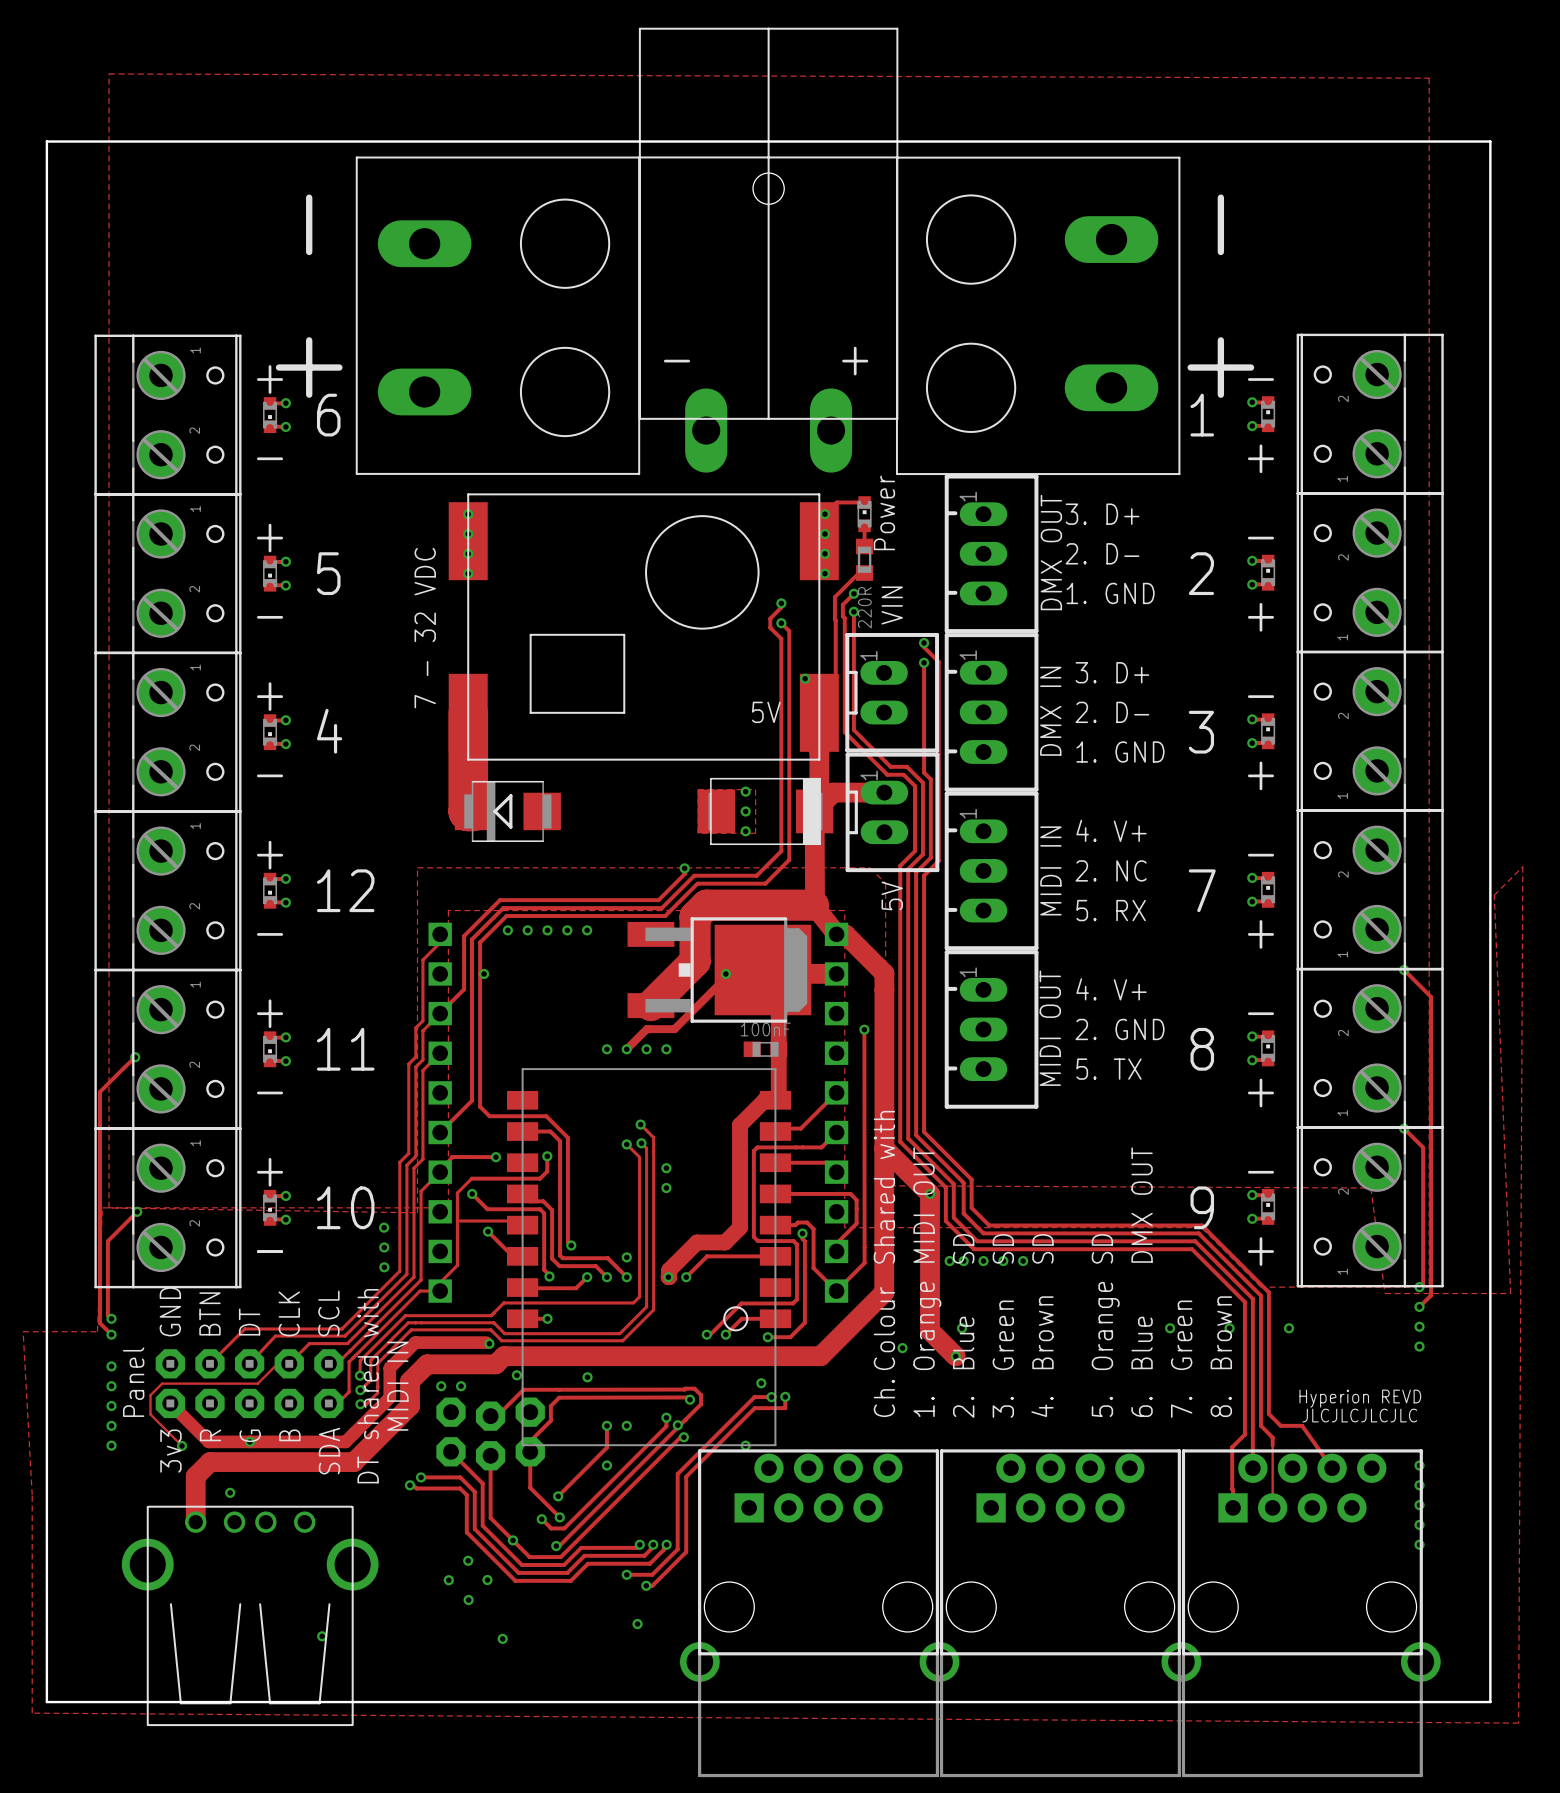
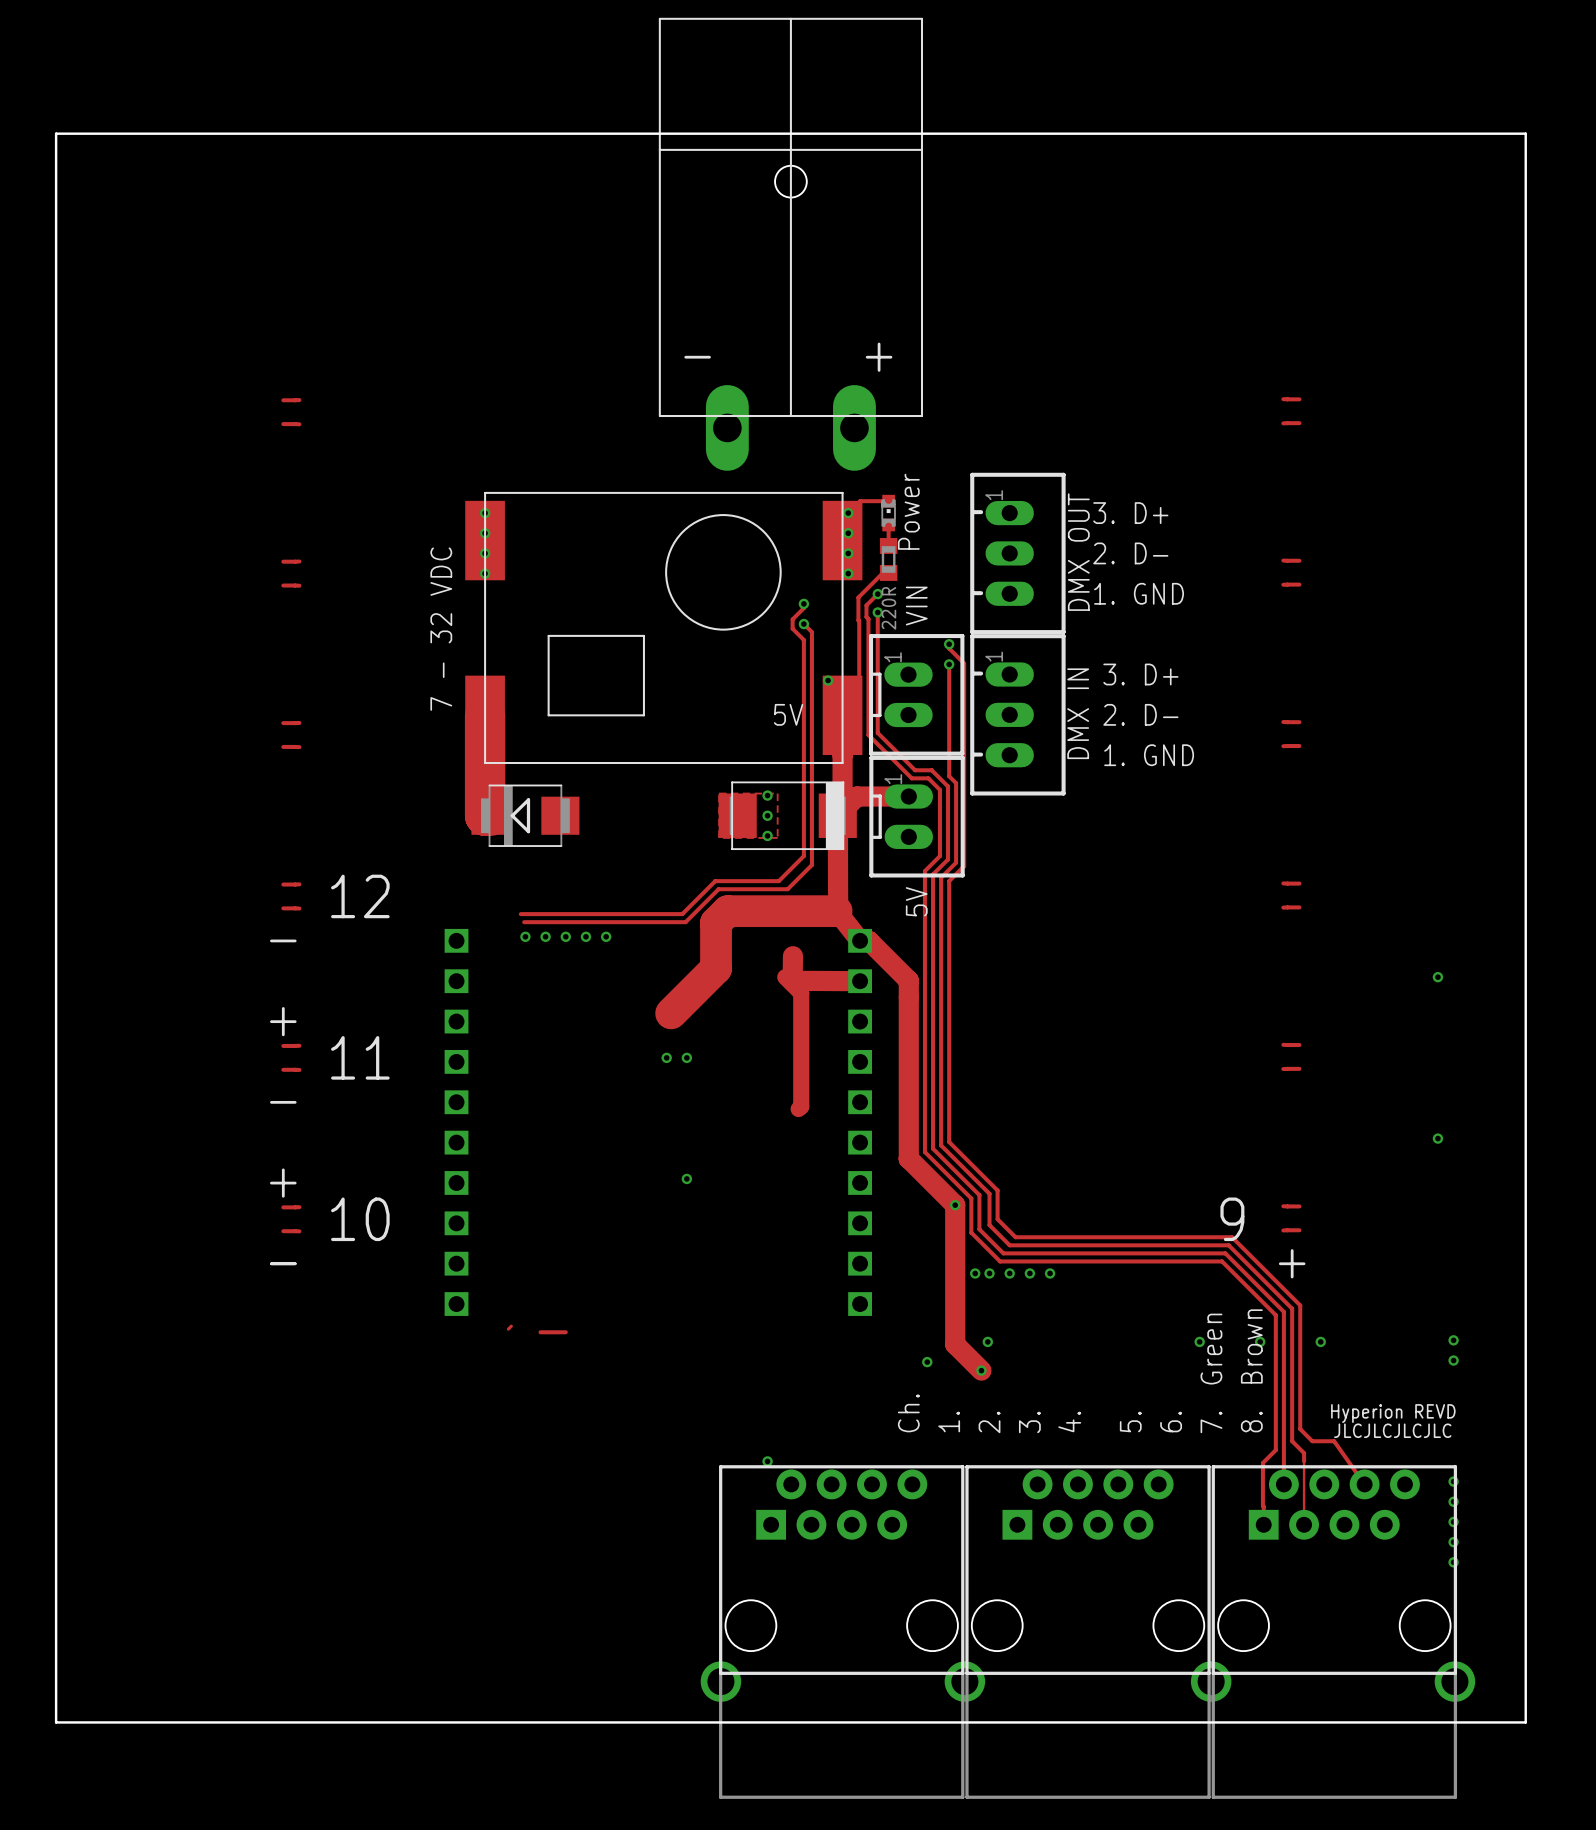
zone outline: (108, 73) (108, 1207) (448, 1207) (448, 910) (844, 910) (844, 1227) (1201, 1227) (1260, 1287) (1429, 1287) (1429, 78) (108, 73) -> none
text: + - (309, 296) -> none
text: + - (1220, 296) -> none
part: (497, 315) -> none
part: (1038, 315) -> none
text: + (270, 379) -> none
text: - (1260, 379) -> none
via: (1252, 402) -> none
via: (285, 403) -> none
part: (1268, 414) -> none
part: (1370, 414) -> none
part: (167, 415) -> none
part: (270, 415) -> none
text: 6 (328, 415) -> none
text: 1 (1202, 415) -> none
via: (285, 426) -> none
via: (1252, 426) -> none
text: - (270, 458) -> none
text: + (1260, 458) -> none
text: + (270, 538) -> none
text: - (1260, 538) -> none
via: (1252, 560) -> none
via: (285, 561) -> none
part: (1268, 572) -> none
part: (1370, 572) -> none
part: (167, 573) -> none
part: (270, 573) -> none
text: 5 (328, 573) -> none
text: 2 (1201, 573) -> none
via: (1252, 584) -> none
via: (285, 585) -> none
text: - (270, 617) -> none
text: + (1260, 617) -> none
text: + (270, 696) -> none
text: - (1260, 696) -> none
via: (1252, 719) -> none
via: (285, 720) -> none
text: 4 (329, 731) -> none
part: (1268, 731) -> none
part: (1370, 731) -> none
part: (167, 732) -> none
part: (270, 732) -> none
text: 3 (1201, 732) -> none
via: (1252, 743) -> none
via: (285, 744) -> none
text: - (270, 775) -> none
text: + (1260, 775) -> none
text: 4. V+ (1111, 830) -> none
text: + (270, 855) -> none
text: - (1260, 855) -> none
zone outline: (1522, 866) (1494, 895) (1510, 1293) (1385, 1293) (1370, 1188) (889, 1185) (885, 1289) (885, 883) (870, 867) (417, 867) (417, 1212) (102, 1207) (97, 1331) (23, 1331) (32, 1495) (32, 1713) (1518, 1723) (1522, 866) -> none
track: (684, 868) (684, 874) (658, 900) (500, 900) (464, 936) (464, 989) (422, 1030) (422, 1059) (415, 1067) (415, 1156) (406, 1165) (406, 1274) (344, 1336) (275, 1336) (249, 1363) -> none
via: (684, 868) -> none
part: (991, 870) -> none
text: MIDI IN (1050, 870) -> none
text: 2. NC (1111, 870) -> none
via: (1252, 877) -> none
via: (285, 878) -> none
part: (1268, 889) -> none
part: (1370, 889) -> none
part: (167, 890) -> none
part: (270, 890) -> none
text: 7 (1202, 890) -> none
via: (1252, 901) -> none
via: (285, 902) -> none
track: (503, 908) (472, 939) (472, 1100) (440, 1132) -> none
text: 5. RX (1111, 910) -> none
track: (506, 916) (480, 942) (480, 1106) (489, 1116) (546, 1116) (567, 1137) (567, 1242) (571, 1245) -> none
track: (440, 934) (440, 942) (422, 959) (422, 1020) (415, 1027) (415, 1056) (408, 1064) (408, 1153) (399, 1162) (399, 1271) (342, 1328) (244, 1328) (209, 1363) -> none
text: + (1260, 934) -> none
part: (719, 970) -> none
track: (1404, 970) (1431, 996) (1431, 1295) (1419, 1306) -> none
track: (763, 971) (731, 971) (674, 1029) (646, 1029) (626, 1049) -> none
via: (484, 973) -> none
via: (725, 973) -> none
text: 4. V+ (1111, 989) -> none
text: - (1260, 1013) -> none
text: MIDI OUT (1050, 1028) -> none
track: (864, 1029) (864, 1263) (836, 1291) (813, 1268) (813, 1228) (807, 1222) (797, 1222) (795, 1225) (775, 1225) (777, 1227) -> none
via: (864, 1029) -> none
part: (991, 1029) -> none
text: 2. GND (1120, 1029) -> none
via: (1252, 1036) -> none
via: (285, 1037) -> none
part: (1268, 1048) -> none
part: (1370, 1048) -> none
part: (167, 1049) -> none
part: (270, 1049) -> none
via: (606, 1049) -> none
via: (626, 1049) -> none
part: 100nF (765, 1049) -> none
text: 8 (1202, 1049) -> none
track: (440, 1053) (422, 1070) (422, 1159) (413, 1168) (413, 1277) (347, 1343) (309, 1343) (289, 1363) (277, 1363) (257, 1383) (162, 1383) (150, 1395) (150, 1414) (181, 1445) -> none
track: (135, 1057) (99, 1092) (99, 1323) (111, 1334) -> none
via: (135, 1057) -> none
via: (1252, 1060) -> none
via: (285, 1061) -> none
text: 5. TX (1108, 1069) -> none
track: (836, 1092) (800, 1128) (778, 1128) (775, 1131) (779, 1131) -> none
text: + (1260, 1092) -> none
track: (775, 1100) (764, 1100) (739, 1125) (739, 1227) (725, 1242) (696, 1242) (669, 1270) (668, 1277) -> none
track: (640, 1124) (653, 1137) (653, 1309) (622, 1340) (501, 1340) (490, 1329) (411, 1329) (377, 1363) (377, 1387) -> none
via: (640, 1124) -> none
track: (1404, 1128) (1423, 1147) (1423, 1283) (1419, 1287) -> none
track: (836, 1132) (821, 1147) (757, 1147) (753, 1150) (753, 1236) (757, 1241) (793, 1241) (796, 1244) (796, 1299) (792, 1303) (741, 1303) (710, 1334) (706, 1334) -> none
track: (511, 1134) (514, 1131) (550, 1131) (560, 1141) (560, 1255) (562, 1258) (607, 1258) (626, 1277) -> none
track: (641, 1143) (646, 1148) (646, 1306) (619, 1333) (504, 1333) (493, 1322) (408, 1322) (370, 1360) (370, 1380) (364, 1386) -> none
via: (641, 1143) -> none
track: (626, 1144) (639, 1157) (639, 1297) (633, 1302) (503, 1302) (491, 1315) (405, 1315) (360, 1360) (360, 1375) -> none
via: (626, 1144) -> none
track: (884, 1148) (884, 1292) (820, 1356) (503, 1356) (495, 1364) (427, 1364) (410, 1381) (410, 1406) (353, 1462) (209, 1462) (195, 1476) (195, 1522) -> none
track: (495, 1156) (452, 1156) (421, 1191) (421, 1279) (334, 1366) (328, 1366) -> none
track: (547, 1156) (547, 1171) (540, 1178) (471, 1178) (457, 1192) (457, 1265) (440, 1282) (440, 1291) (420, 1291) (353, 1357) -> none
via: (547, 1156) -> none
via: (495, 1157) -> none
track: (775, 1162) (827, 1162) (836, 1172) -> none
text: - (1260, 1172) -> none
text: Shared with (884, 1187) -> none
via: (666, 1188) -> none
track: (472, 1193) (487, 1209) (540, 1209) (544, 1213) (544, 1269) (549, 1276) -> none
via: (472, 1193) -> none
track: (527, 1193) (522, 1193) (529, 1201) (543, 1201) (552, 1210) (552, 1258) (559, 1266) (595, 1266) (606, 1277) -> none
track: (775, 1193) (850, 1193) (856, 1200) (856, 1223) (836, 1243) (836, 1251) -> none
via: (285, 1195) -> none
via: (1252, 1195) -> none
text: MIDI OUT (924, 1205) -> none
text: DMX OUT (1142, 1205) -> none
part: (1268, 1206) -> none
part: (1370, 1206) -> none
part: (167, 1207) -> none
part: (270, 1207) -> none
track: (137, 1211) (107, 1241) (107, 1315) (111, 1318) -> none
via: (137, 1211) -> none
via: (1252, 1218) -> none
via: (285, 1219) -> none
track: (457, 1220) (512, 1220) (516, 1225) (522, 1225) -> none
via: (384, 1227) -> none
track: (488, 1231) (512, 1256) (522, 1256) -> none
via: (488, 1231) -> none
track: (802, 1233) (802, 1238) (804, 1241) (804, 1322) (790, 1337) (767, 1337) -> none
via: (802, 1233) -> none
via: (571, 1245) -> none
via: (384, 1247) -> none
text: SD (963, 1248) -> none
text: SD (1003, 1248) -> none
text: SD (1042, 1248) -> none
text: SD (1102, 1248) -> none
track: (775, 1256) (707, 1256) (686, 1277) -> none
via: (626, 1257) -> none
part: (649, 1257) -> none
via: (384, 1267) -> none
via: (549, 1276) -> none
track: (587, 1277) (576, 1288) (522, 1287) -> none
via: (587, 1277) -> none
via: (606, 1277) -> none
via: (626, 1277) -> none
via: (668, 1277) -> none
via: (686, 1277) -> none
via: (1419, 1287) -> none
via: (1419, 1306) -> none
text: GND (170, 1311) -> none
text: BTN (209, 1313) -> none
text: CLK (289, 1313) -> none
text: SCL (328, 1313) -> none
via: (111, 1318) -> none
via: (547, 1318) -> none
track: (775, 1318) (741, 1318) (725, 1334) -> none
text: DT (249, 1321) -> none
text: Orange (927, 1325) -> none
text: Orange (1105, 1325) -> none
text: Colour (884, 1328) -> none
text: Brown (1042, 1332) -> none
via: (111, 1334) -> none
via: (706, 1334) -> none
via: (725, 1334) -> none
text: Green (1003, 1335) -> none
via: (767, 1337) -> none
text: Blue (963, 1342) -> none
text: Blue (1142, 1342) -> none
track: (489, 1343) (415, 1342) (389, 1368) (389, 1397) (345, 1441) (208, 1441) (170, 1403) -> none
via: (489, 1343) -> none
track: (353, 1357) (349, 1361) (349, 1391) (328, 1412) (328, 1403) -> none
via: (111, 1366) -> none
via: (360, 1375) -> none
via: (516, 1375) -> none
via: (587, 1377) -> none
text: Panel (133, 1382) -> none
part: (249, 1383) -> none
via: (761, 1383) -> none
via: (111, 1386) -> none
text: DT shared with (368, 1386) -> none
track: (377, 1386) (377, 1392) (366, 1404) (360, 1404) -> none
text: MIDI IN (397, 1386) -> none
via: (441, 1386) -> none
via: (461, 1386) -> none
via: (360, 1390) -> none
track: (785, 1396) (785, 1408) (754, 1408) (686, 1476) (686, 1552) (652, 1585) (646, 1585) -> none
via: (785, 1396) -> none
track: (771, 1397) (754, 1397) (677, 1474) (677, 1549) (652, 1574) (626, 1574) -> none
via: (771, 1397) -> none
track: (689, 1399) (688, 1397) (559, 1397) (550, 1406) (550, 1420) (530, 1441) (530, 1487) (559, 1517) -> none
via: (689, 1399) -> none
via: (360, 1404) -> none
via: (111, 1406) -> none
track: (490, 1416) (497, 1416) (523, 1389) (694, 1388) (701, 1395) (701, 1404) (559, 1546) (556, 1546) -> none
track: (666, 1417) (666, 1426) (564, 1528) (551, 1528) (541, 1519) -> none
via: (666, 1417) -> none
via: (111, 1425) -> none
track: (606, 1425) (606, 1447) (558, 1495) -> none
via: (606, 1425) -> none
via: (626, 1425) -> none
via: (677, 1425) -> none
part: (490, 1433) -> none
text: R (210, 1435) -> none
text: G (250, 1435) -> none
text: B (289, 1435) -> none
track: (683, 1437) (680, 1437) (560, 1557) (529, 1557) (490, 1518) (490, 1455) -> none
via: (683, 1437) -> none
via: (249, 1441) -> none
via: (111, 1445) -> none
via: (181, 1445) -> none
text: 3v3 (170, 1451) -> none
text: SDA (329, 1451) -> none
track: (450, 1451) (482, 1483) (482, 1525) (521, 1564) (564, 1564) (581, 1547) (636, 1547) (639, 1544) -> none
via: (606, 1465) -> none
track: (421, 1477) (460, 1477) (474, 1491) (474, 1529) (518, 1572) (567, 1572) (584, 1555) (644, 1555) (653, 1544) -> none
via: (421, 1477) -> none
track: (409, 1485) (416, 1488) (460, 1488) (466, 1495) (466, 1532) (515, 1580) (570, 1580) (587, 1563) (649, 1563) (666, 1544) -> none
via: (409, 1485) -> none
via: (230, 1492) -> none
via: (558, 1496) -> none
via: (559, 1517) -> none
via: (541, 1519) -> none
via: (513, 1540) -> none
via: (639, 1544) -> none
via: (653, 1544) -> none
via: (666, 1544) -> none
via: (556, 1546) -> none
via: (468, 1560) -> none
via: (626, 1574) -> none
via: (448, 1580) -> none
via: (487, 1580) -> none
via: (646, 1585) -> none
via: (468, 1600) -> none
part: (250, 1615) -> none
via: (637, 1624) -> none
via: (322, 1636) -> none
via: (502, 1638) -> none

